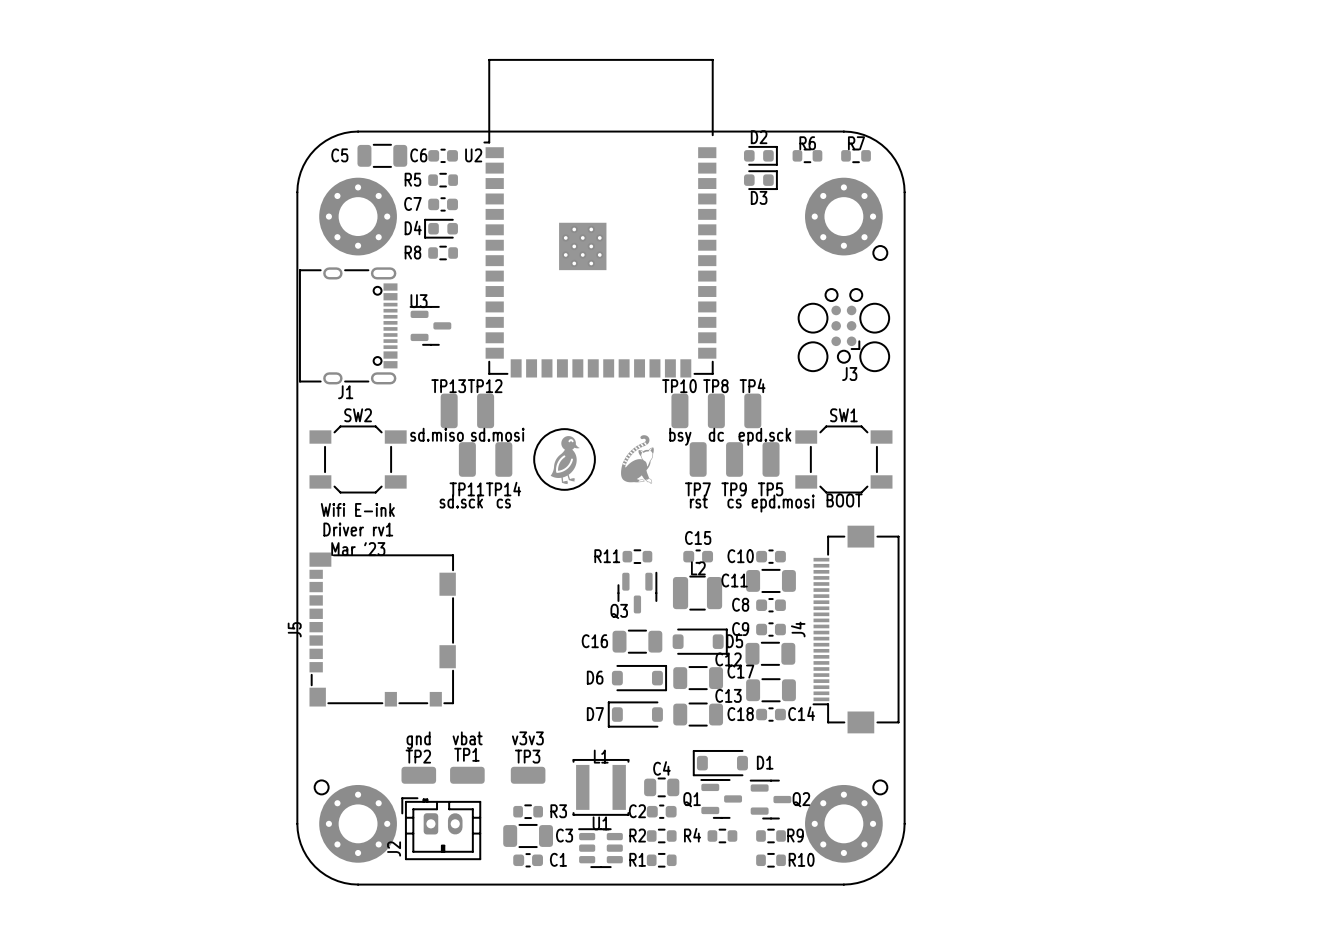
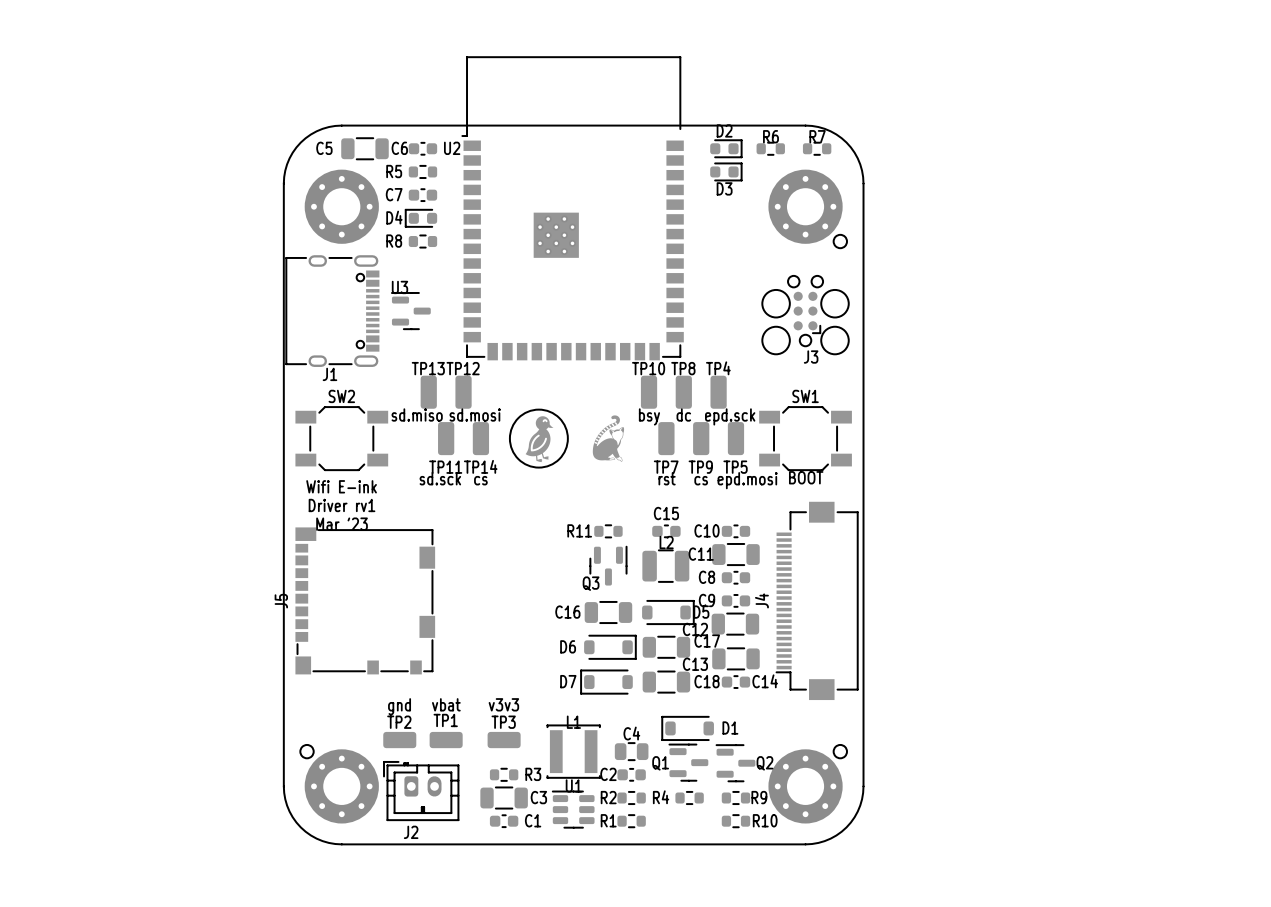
J2 name rotation: 0° (394, 848) -> 90° clockwise (411, 832)
J2 name position: J2 (394, 848) -> J2 (411, 832)

